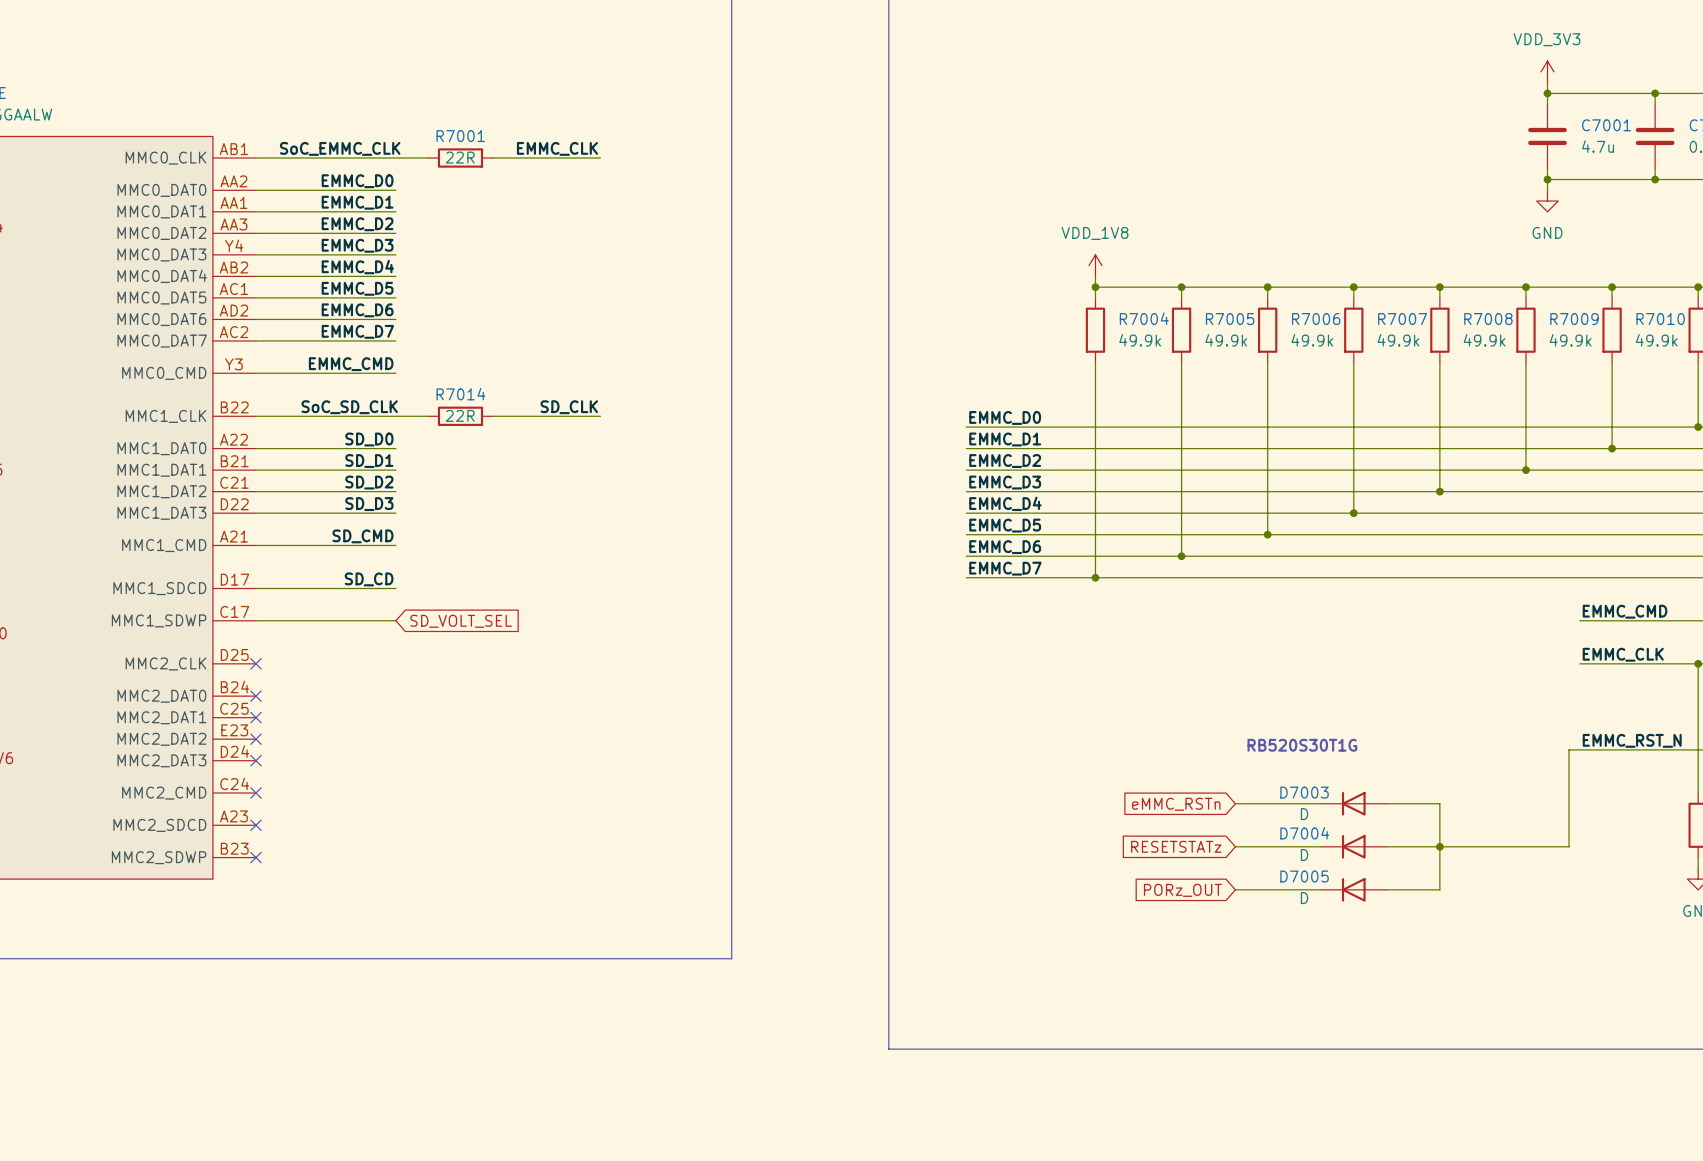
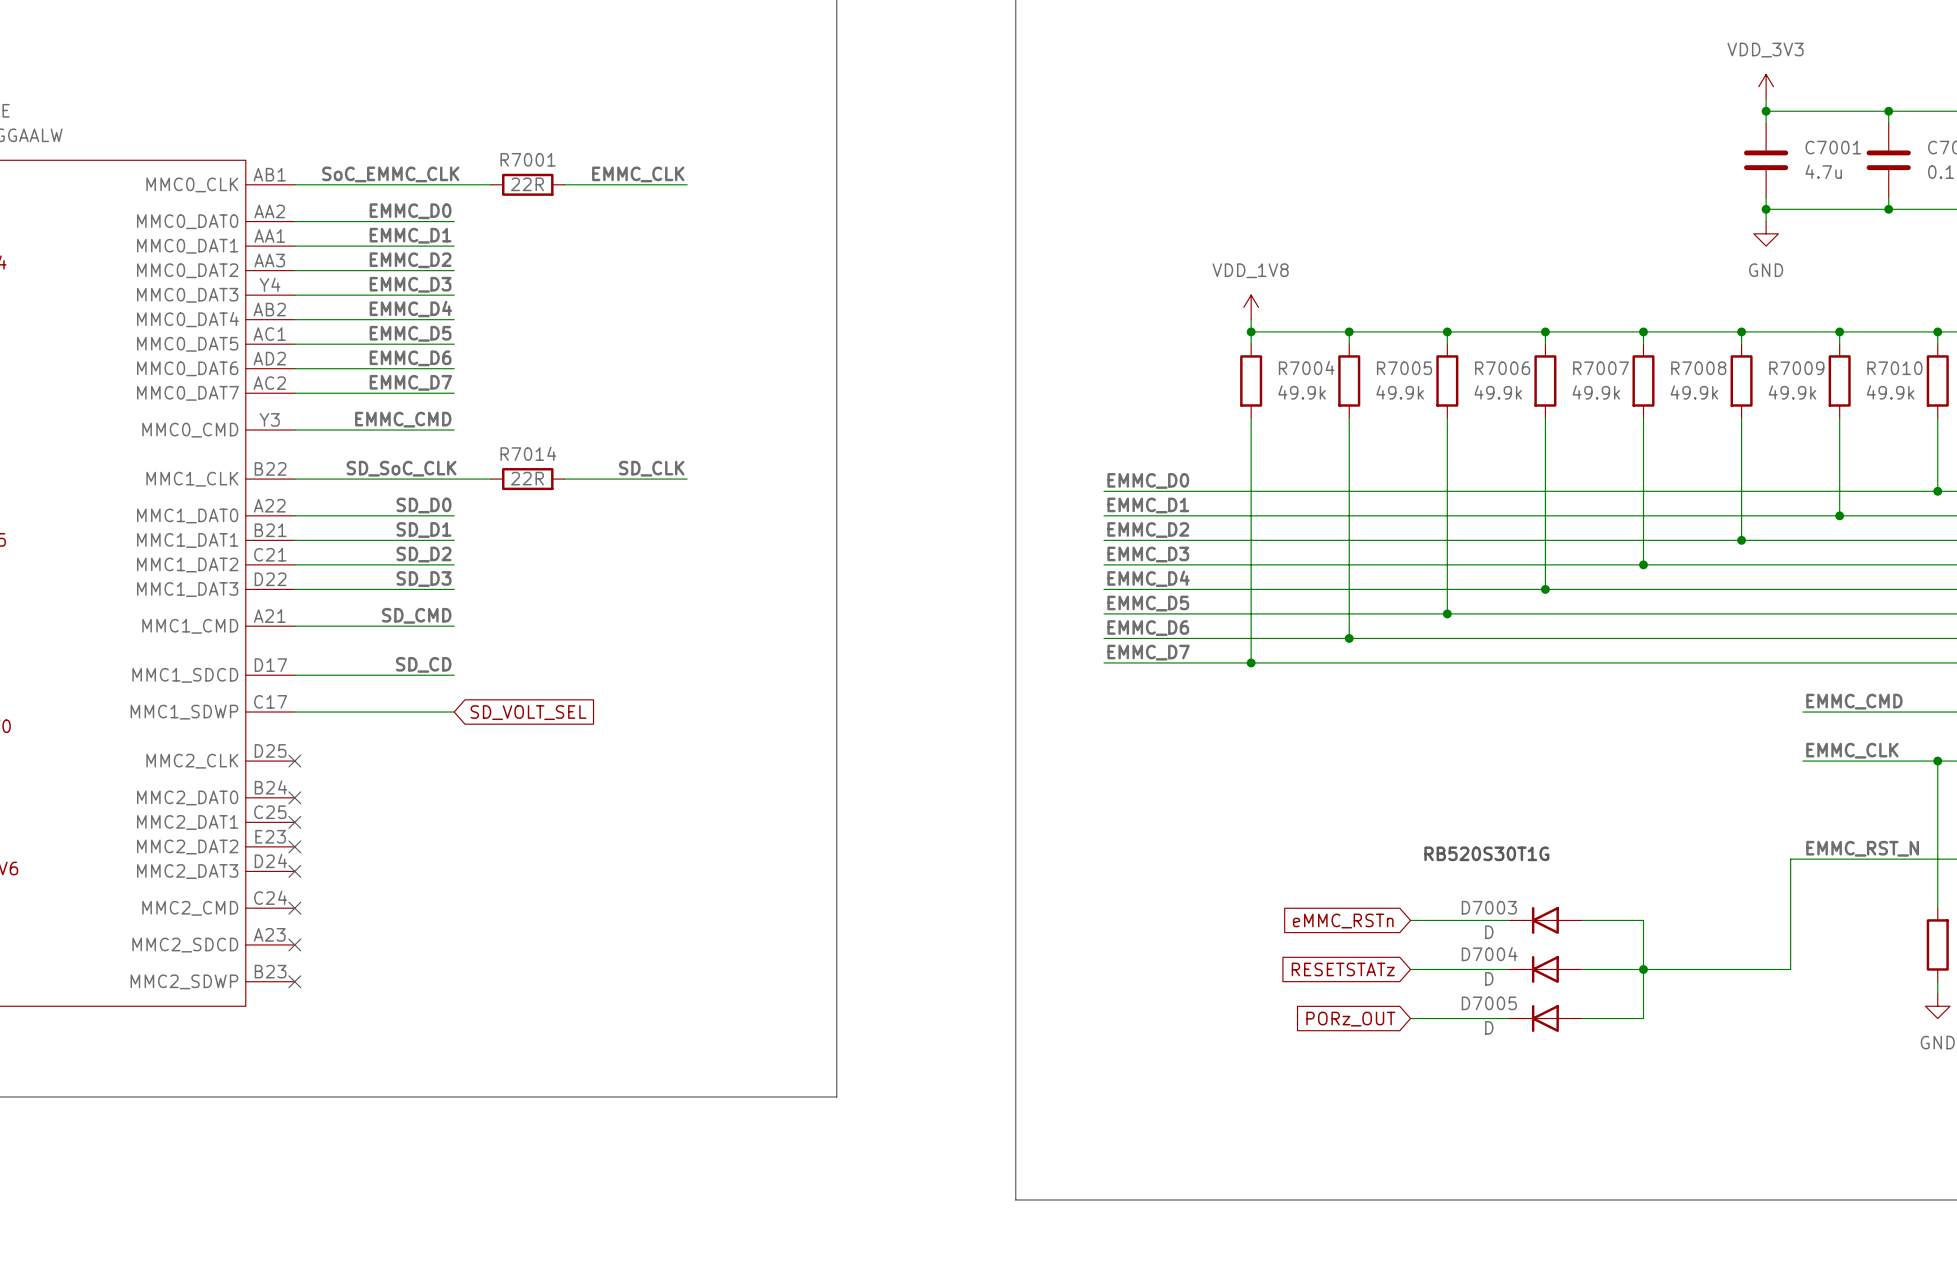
label: SoC_SD_CLK (349, 407) -> SD_SoC_CLK (401, 468)

